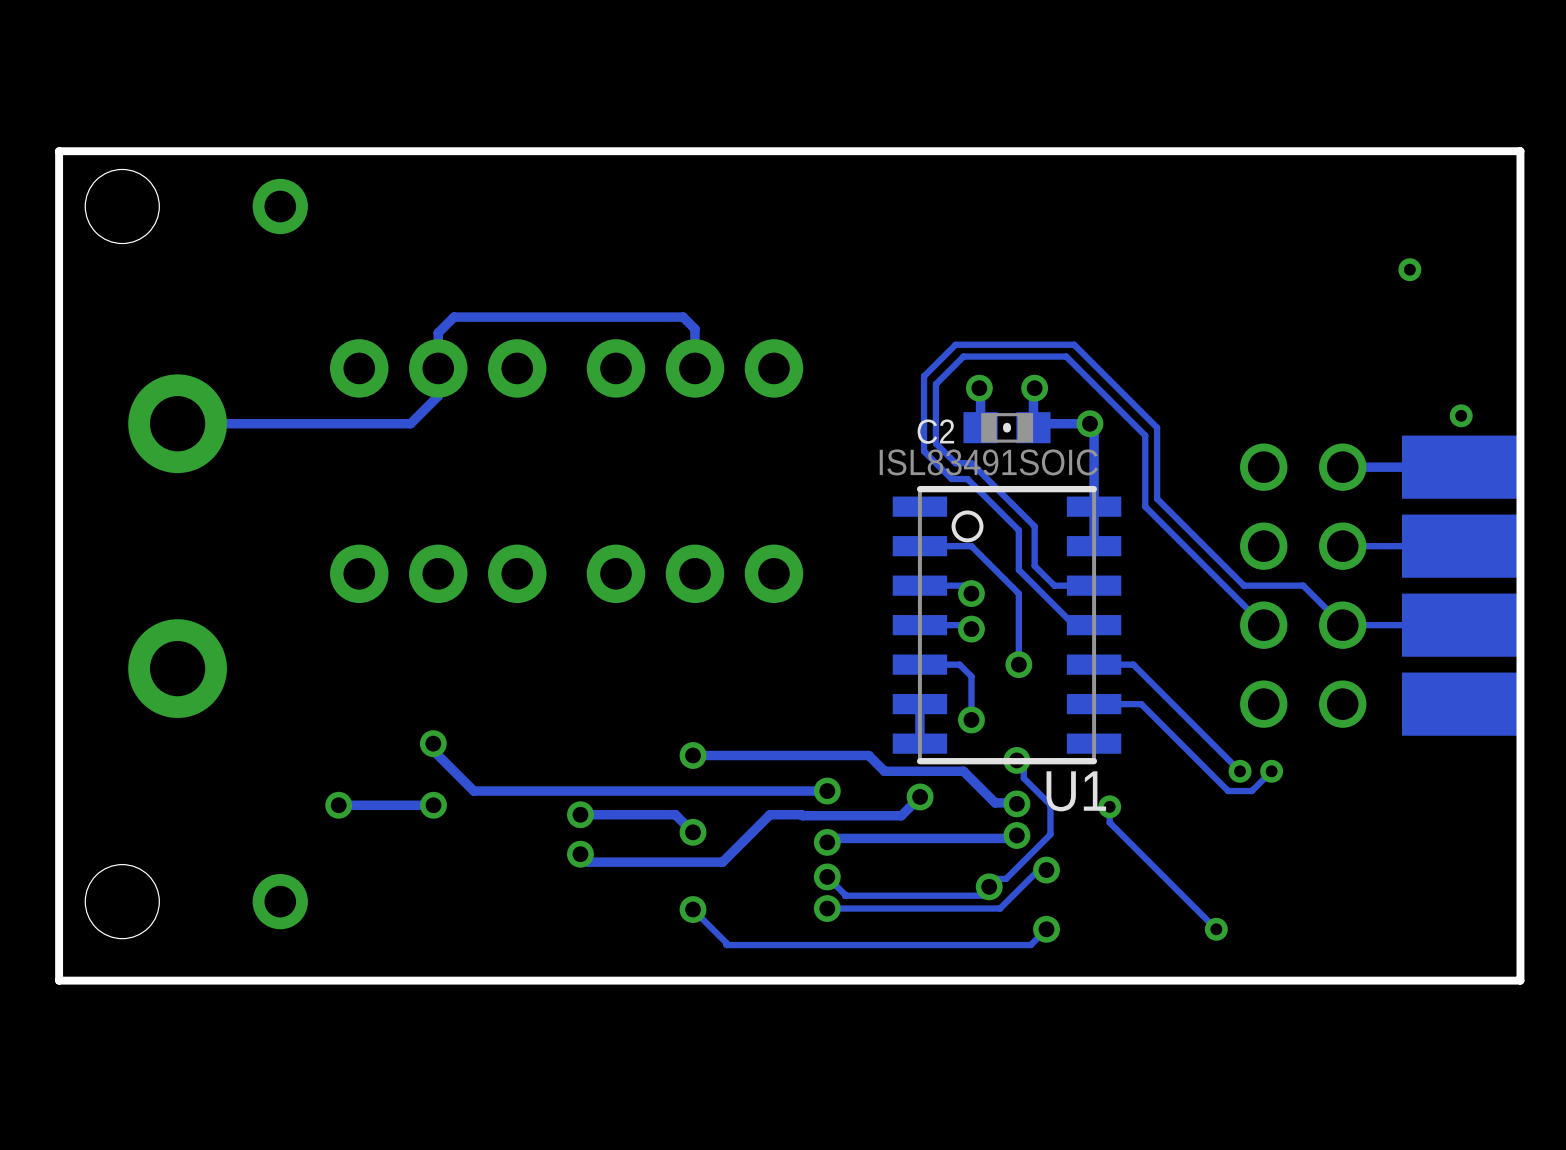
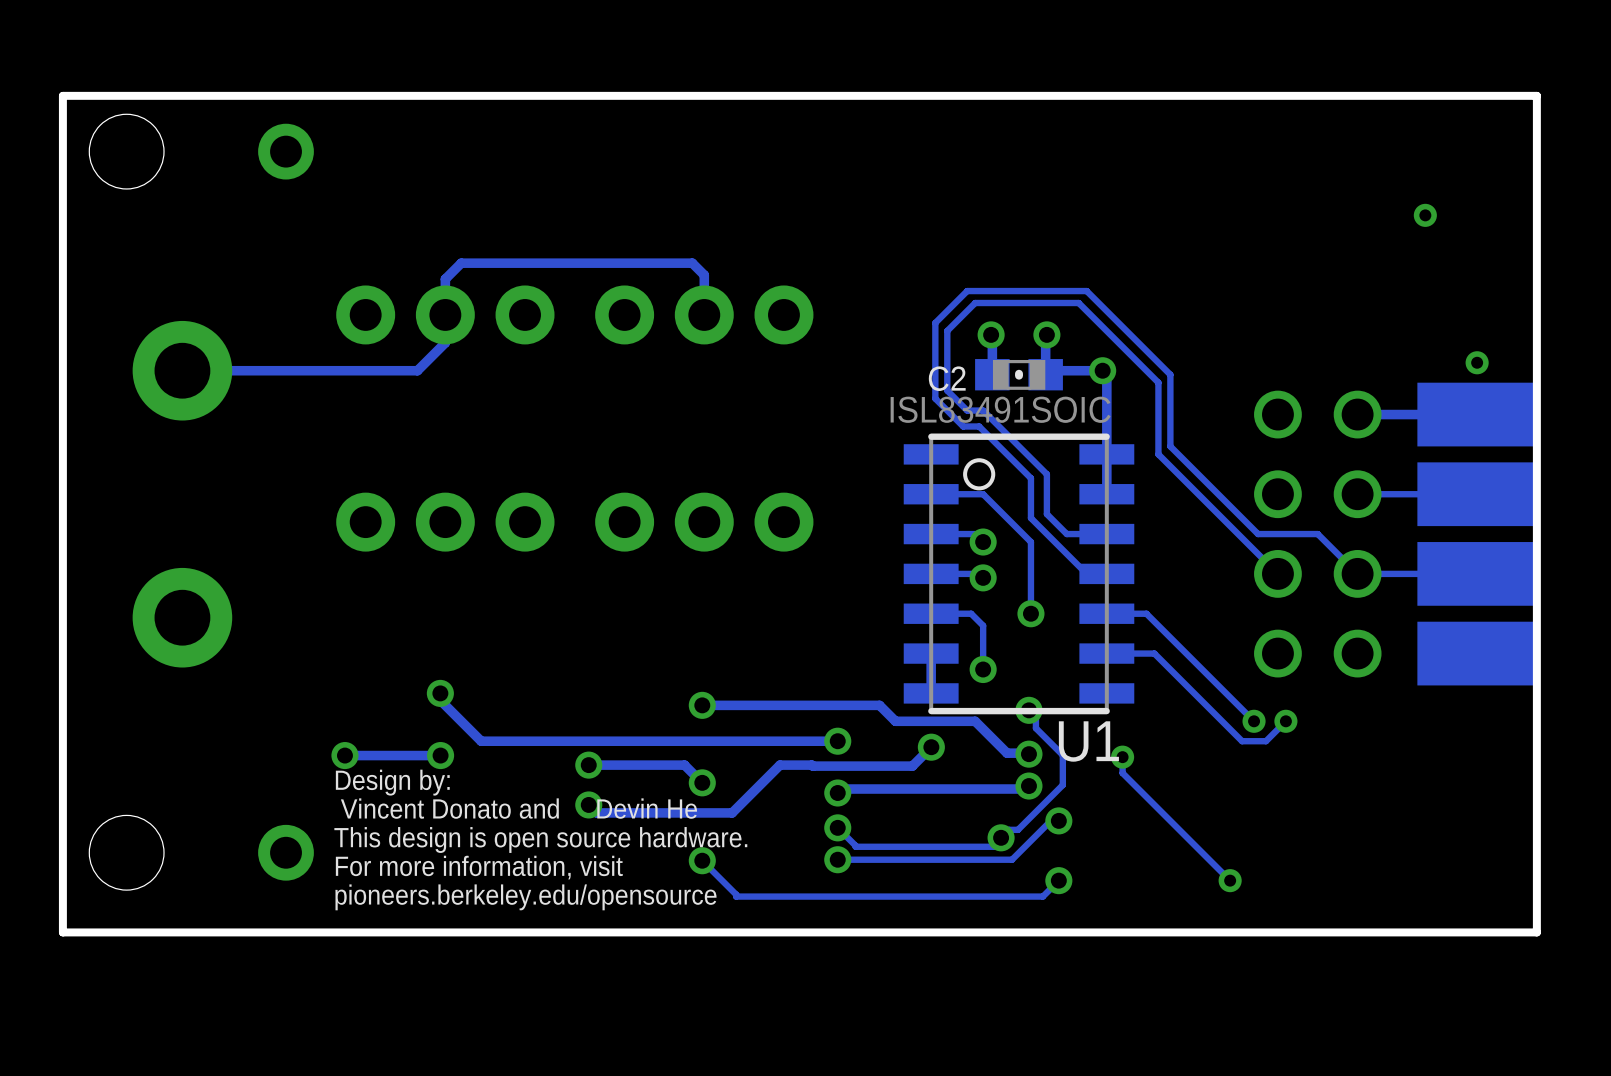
text: none -> Design by: (392, 782)
text: none -> Vincent Donato and Devin He (518, 808)
text: none -> This design is open source hardware. (540, 839)
text: none -> For more information, visit (479, 867)
text: none -> pioneers.berkeley.edu/opensource (525, 897)

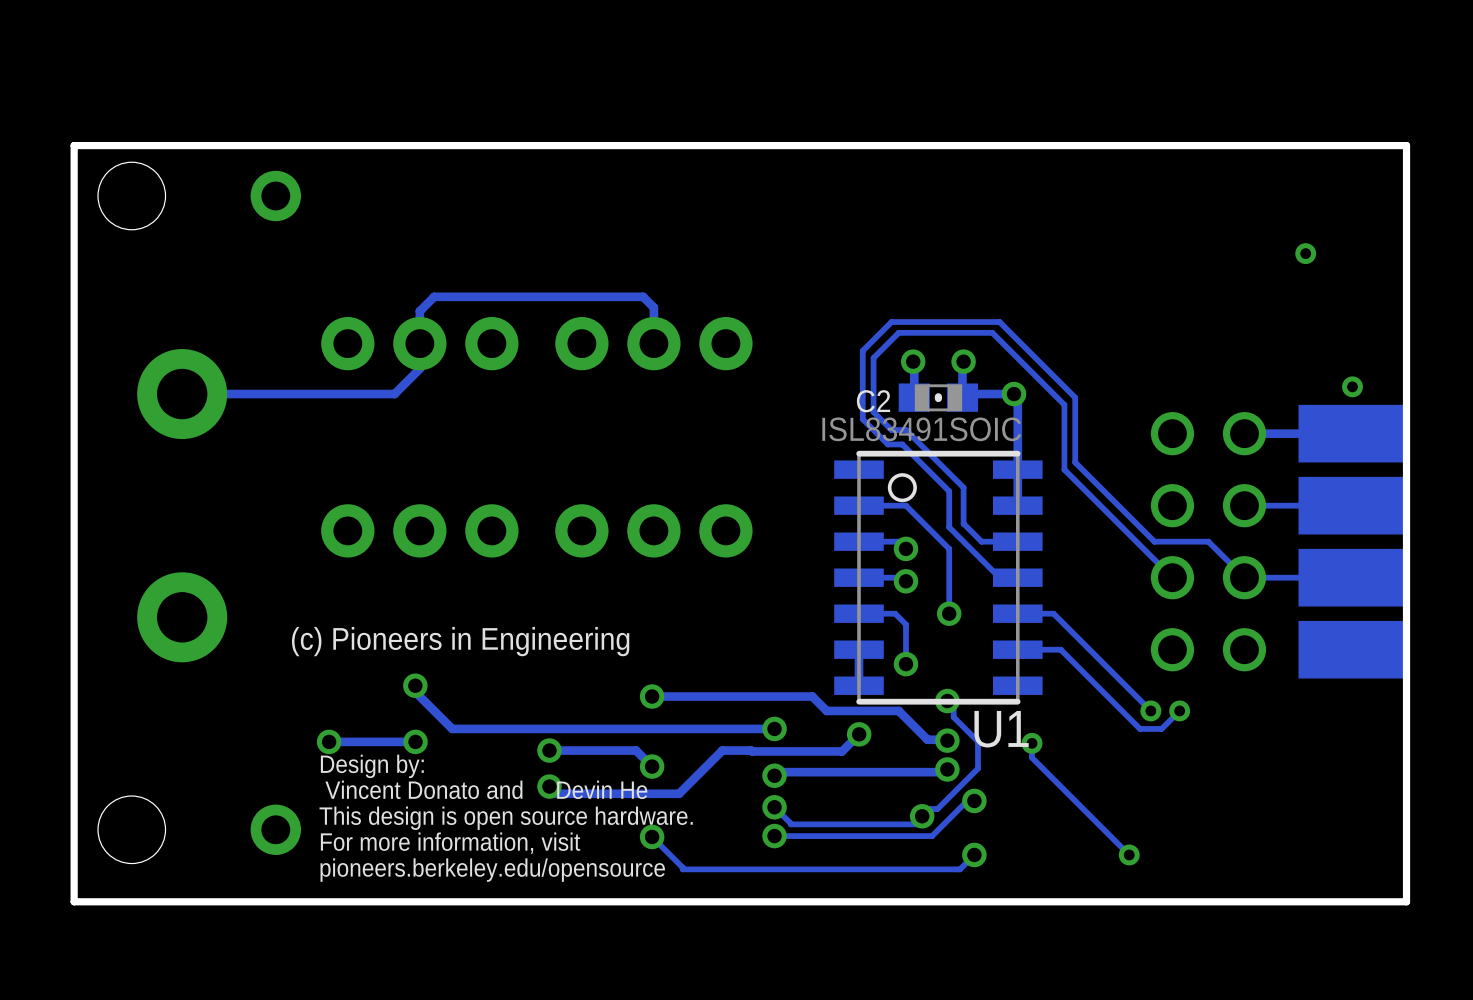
text: none -> (c) Pioneers in Engineering (460, 641)

